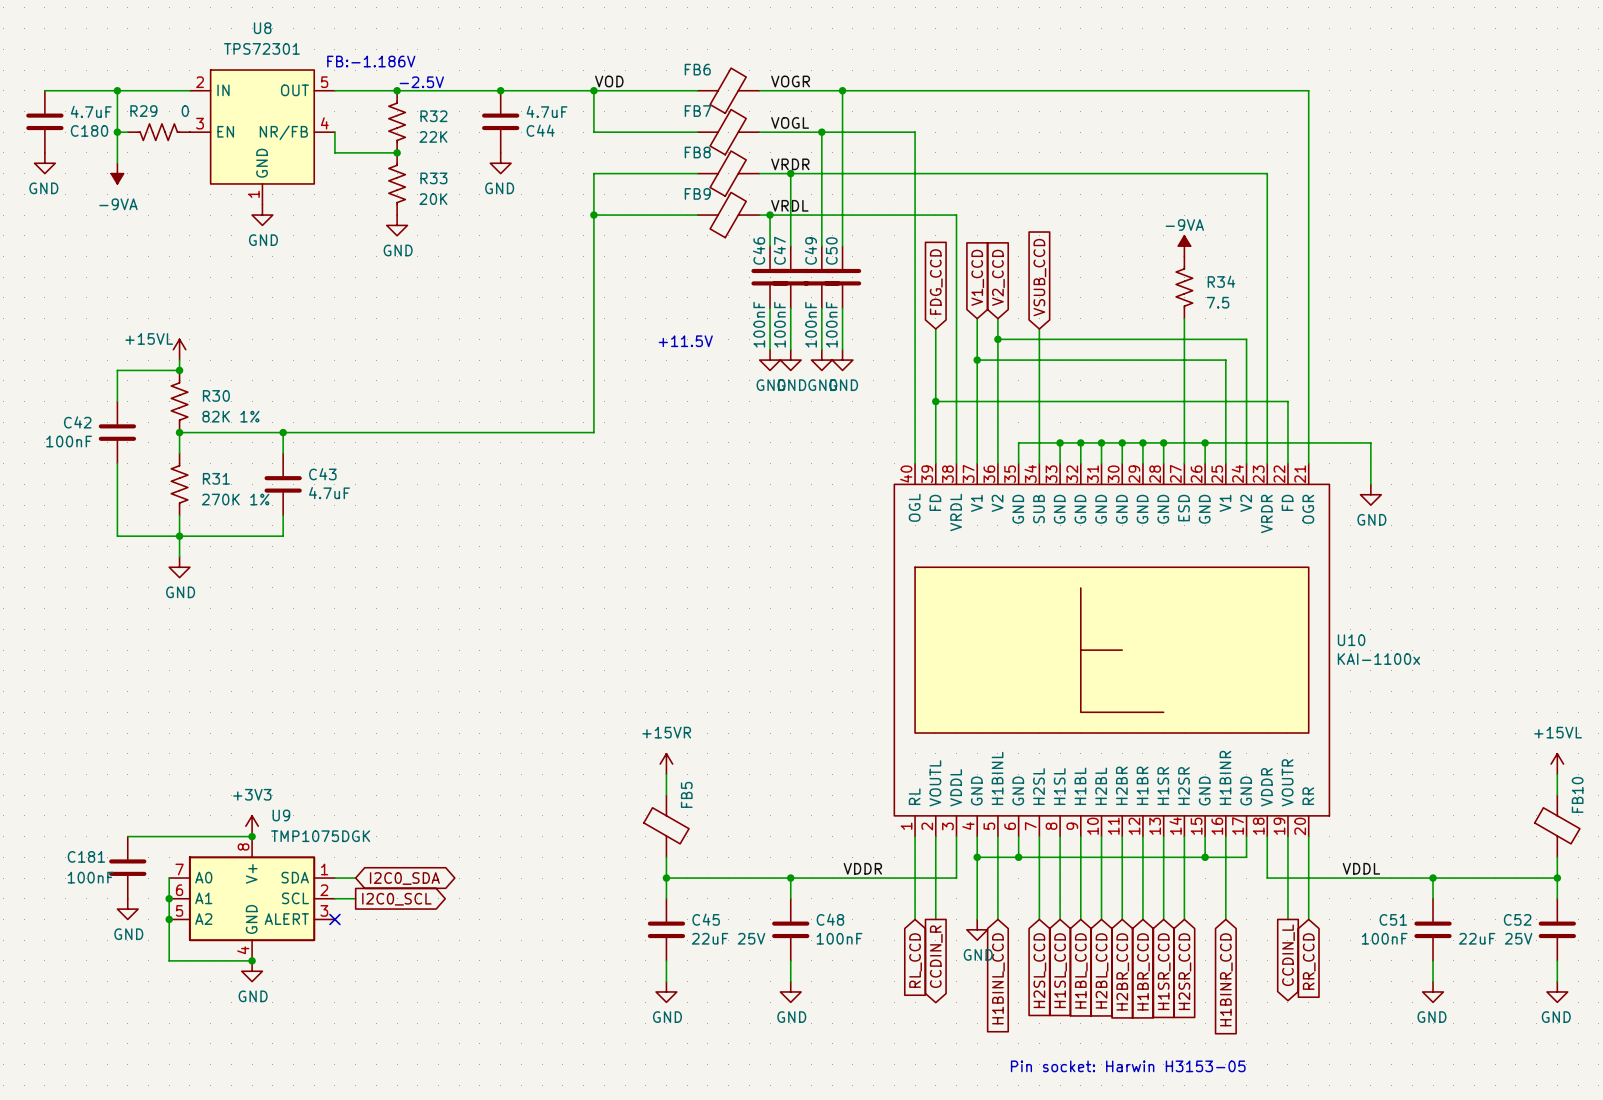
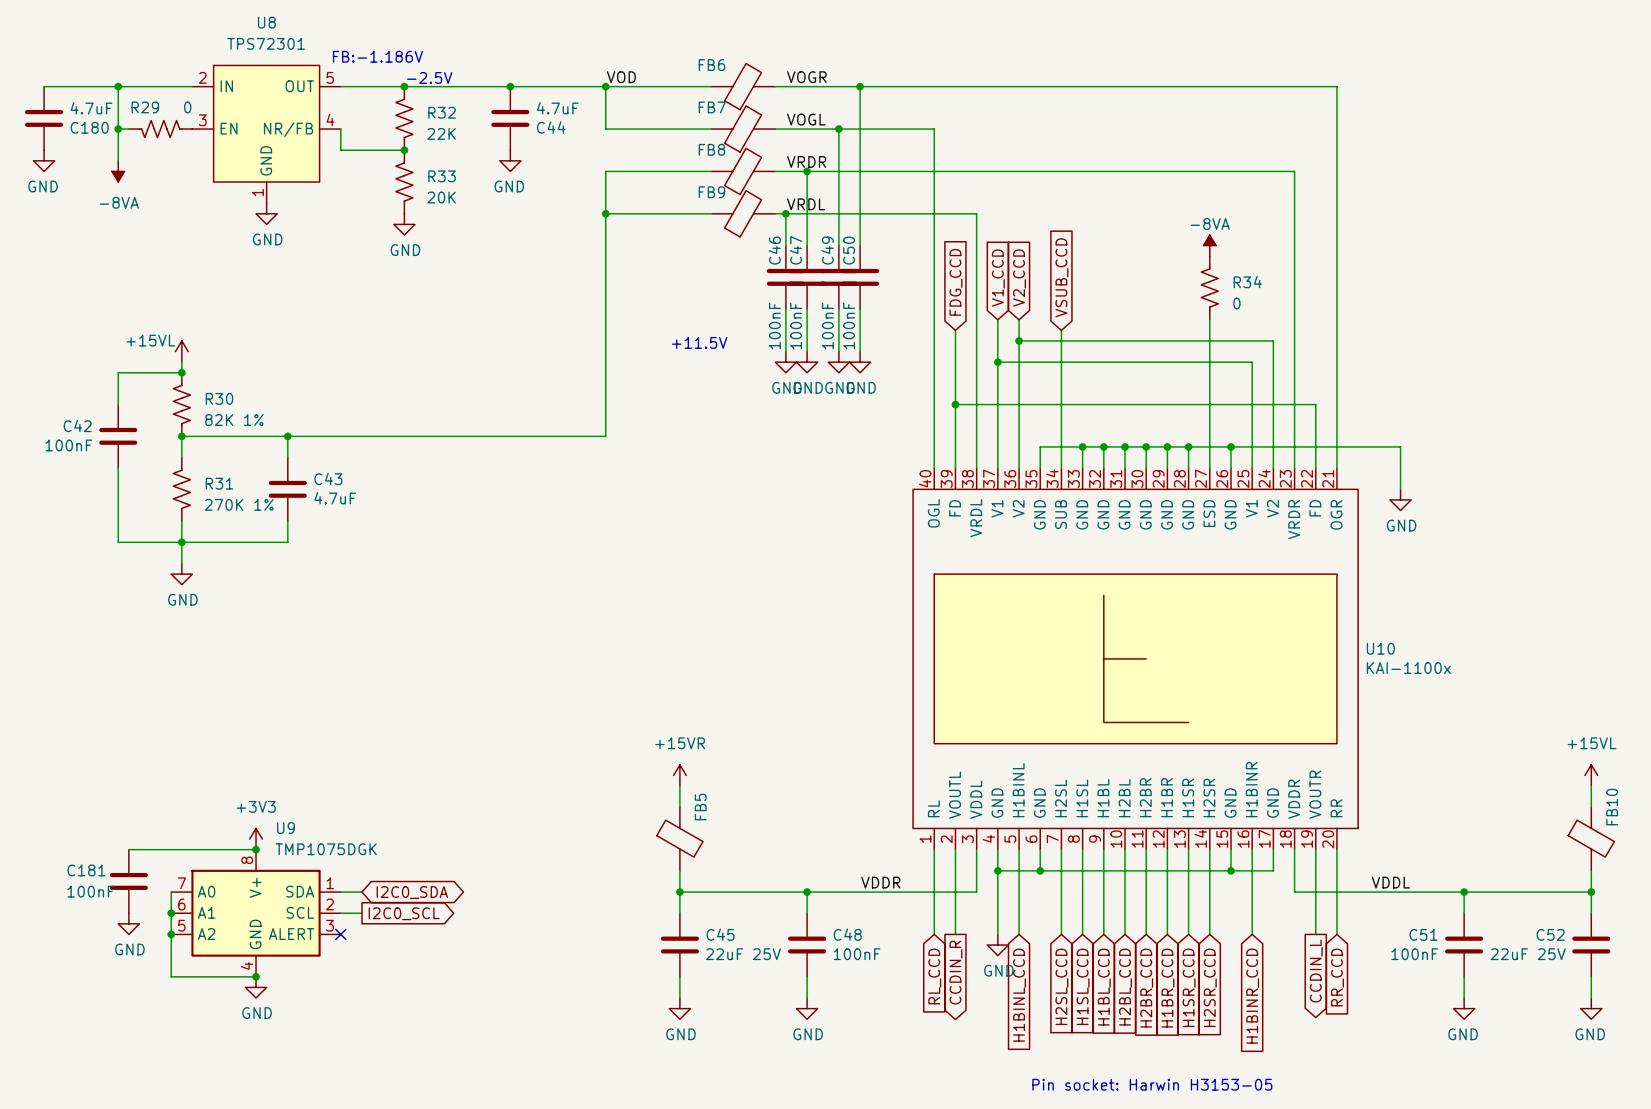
power symbol: -9VA (117, 173) -> -8VA (118, 171)
power symbol: -9VA (1184, 246) -> -8VA (1209, 245)
R34 value: 7.5 (1218, 302) -> 0 (1236, 303)

